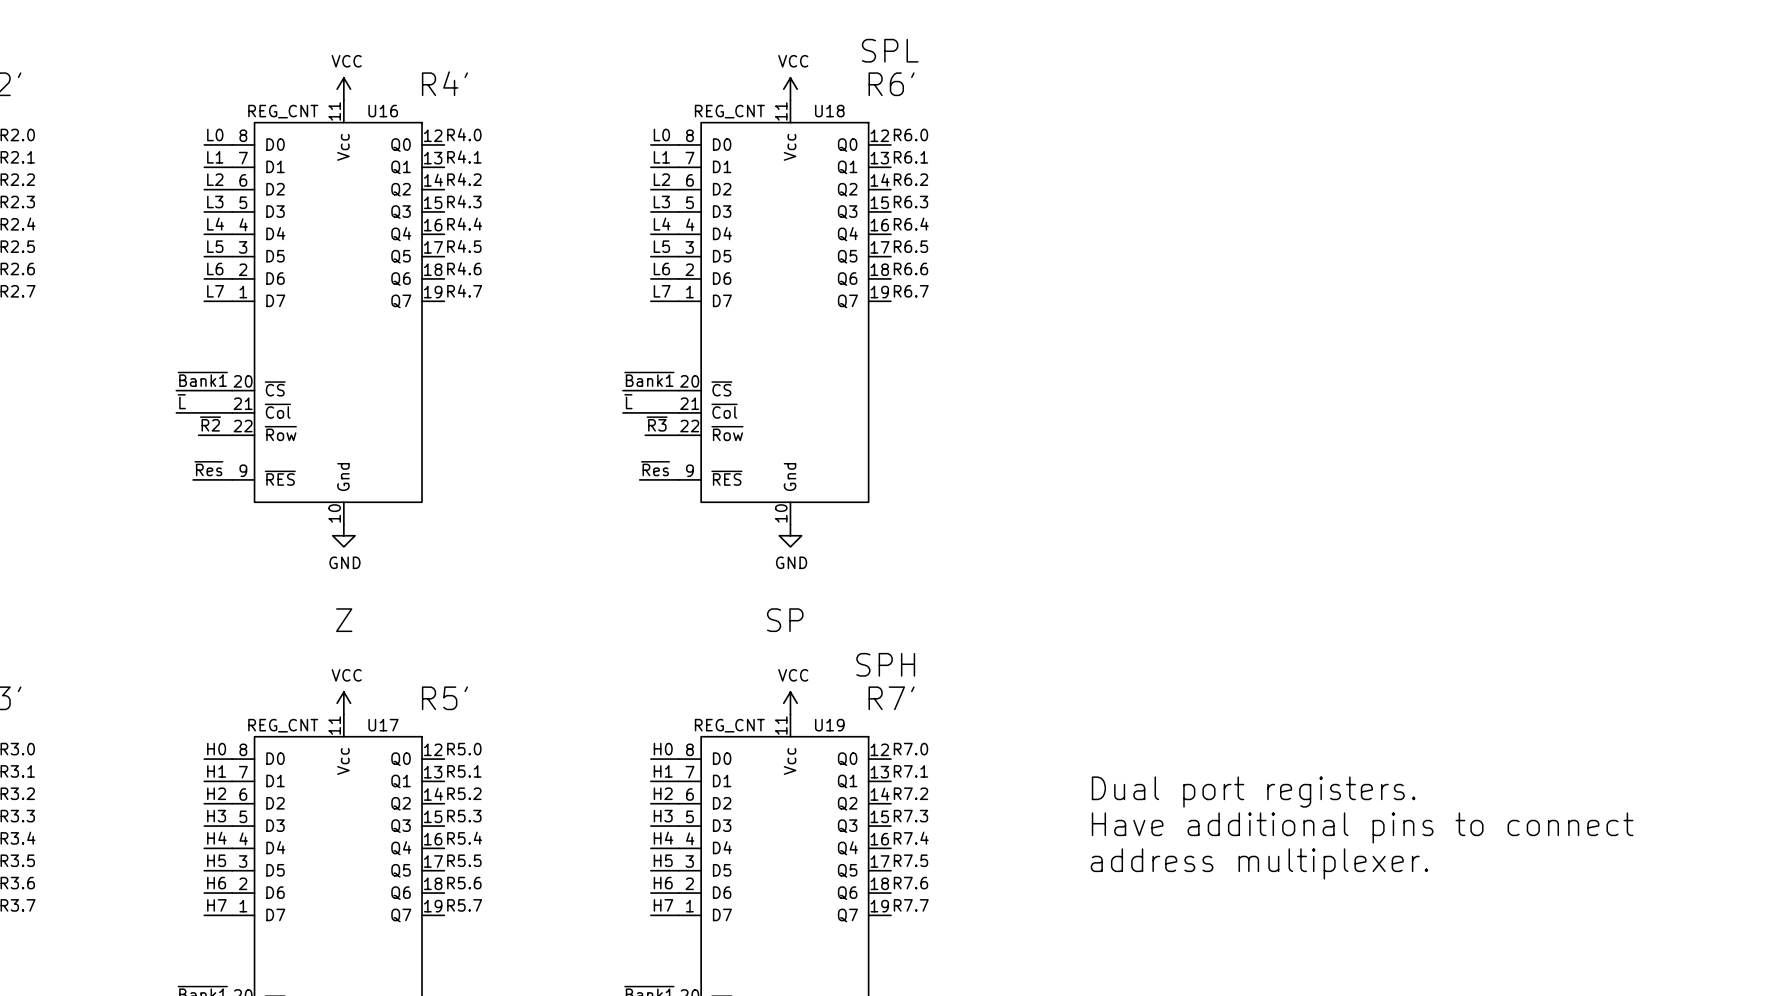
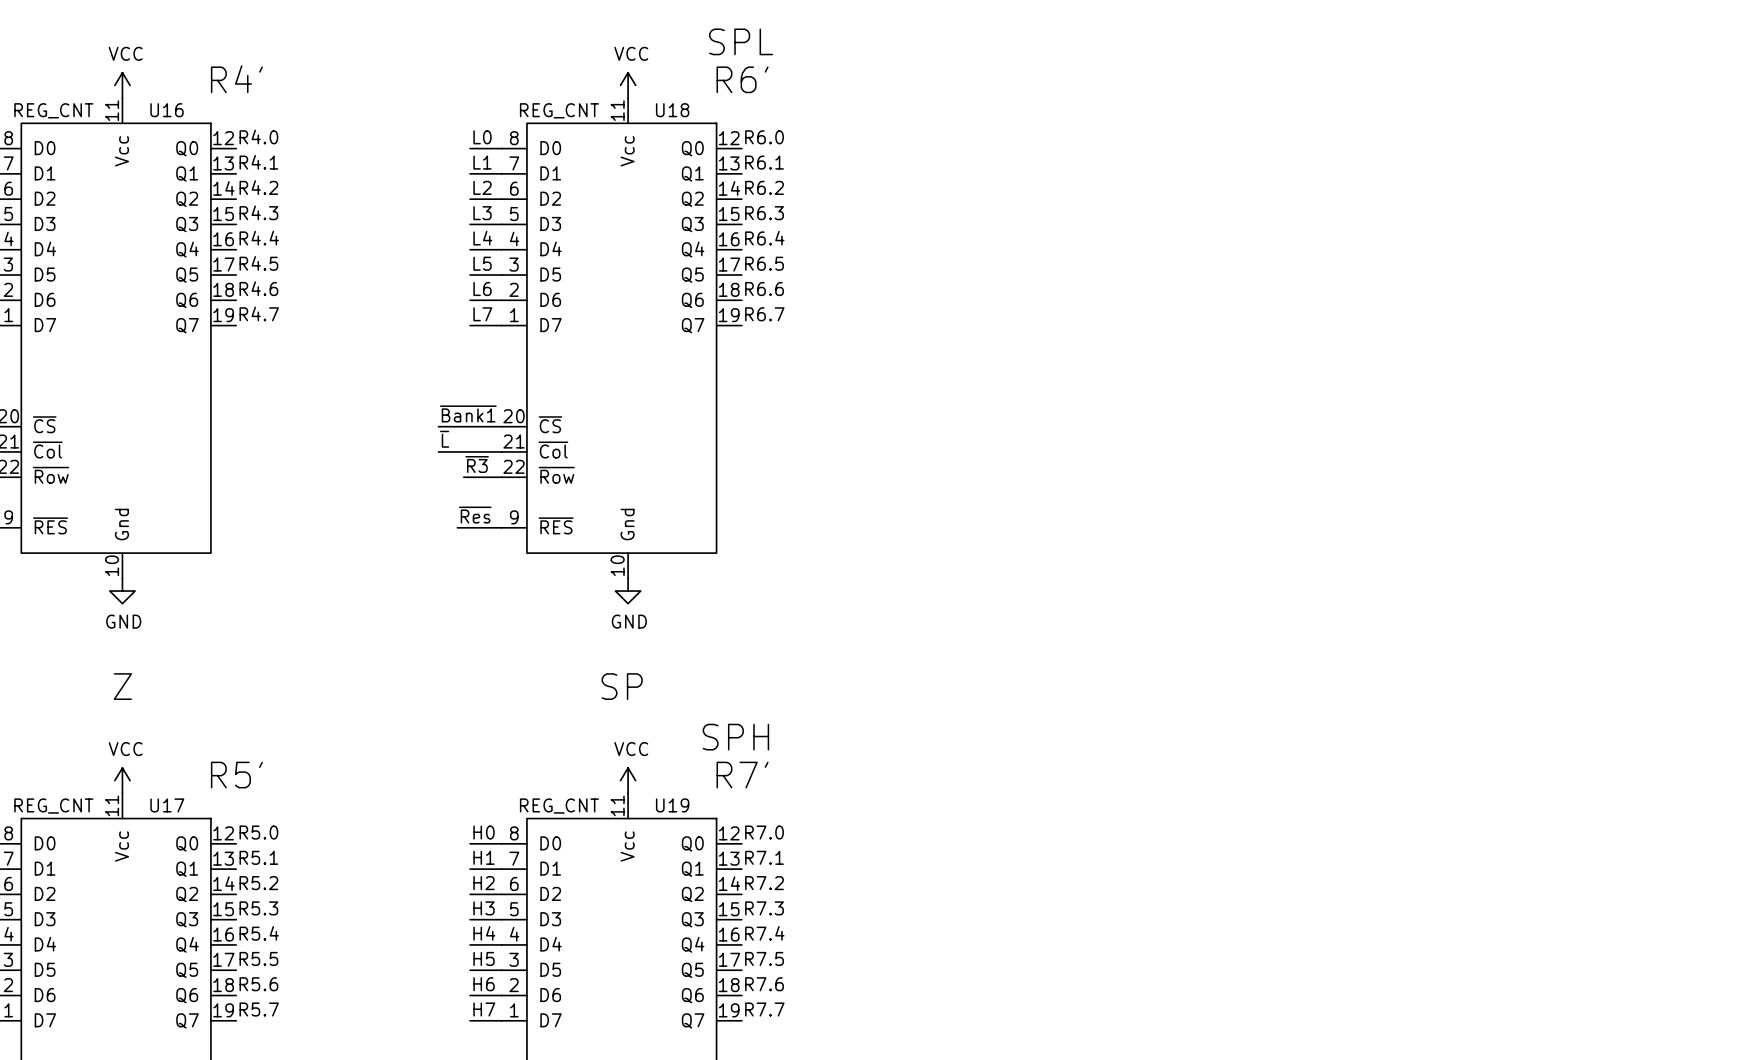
text: Dual port registers. (1253, 792) -> none
text: Have additional pins to connect (1362, 827) -> none
text: address multiplexer. (1259, 863) -> none

